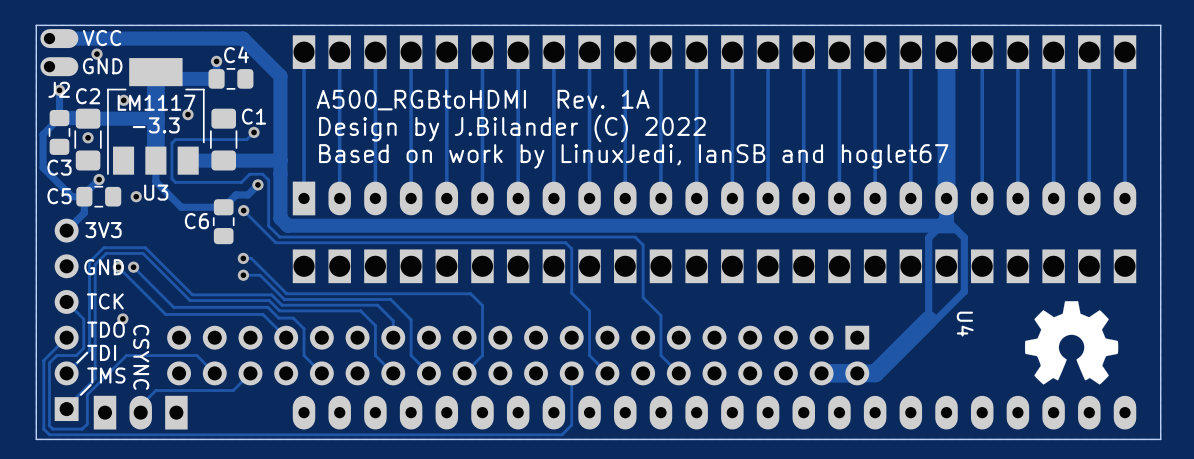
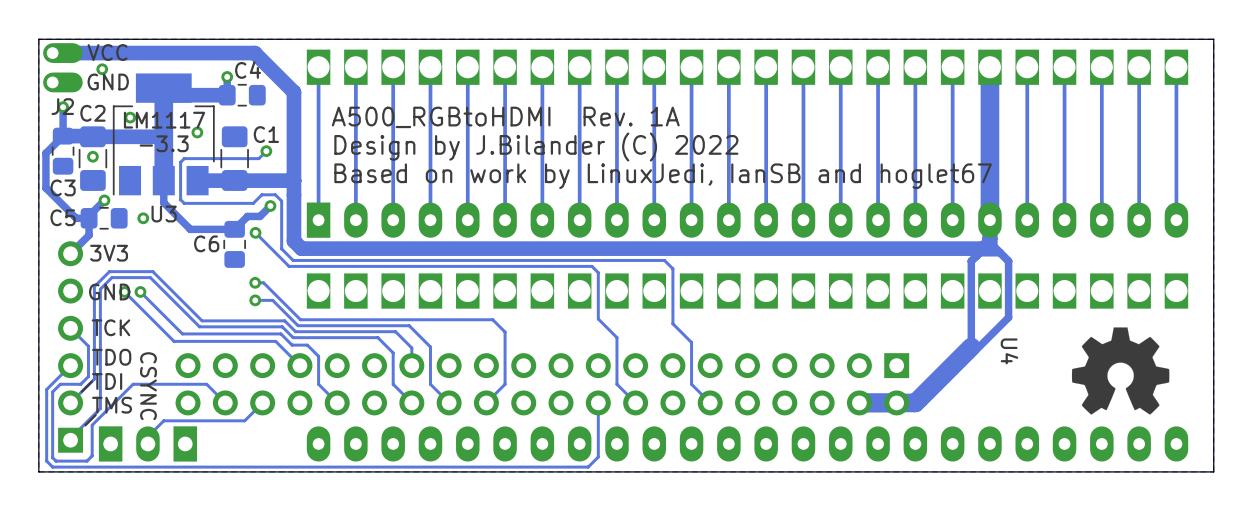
via: (122, 318) -> none

